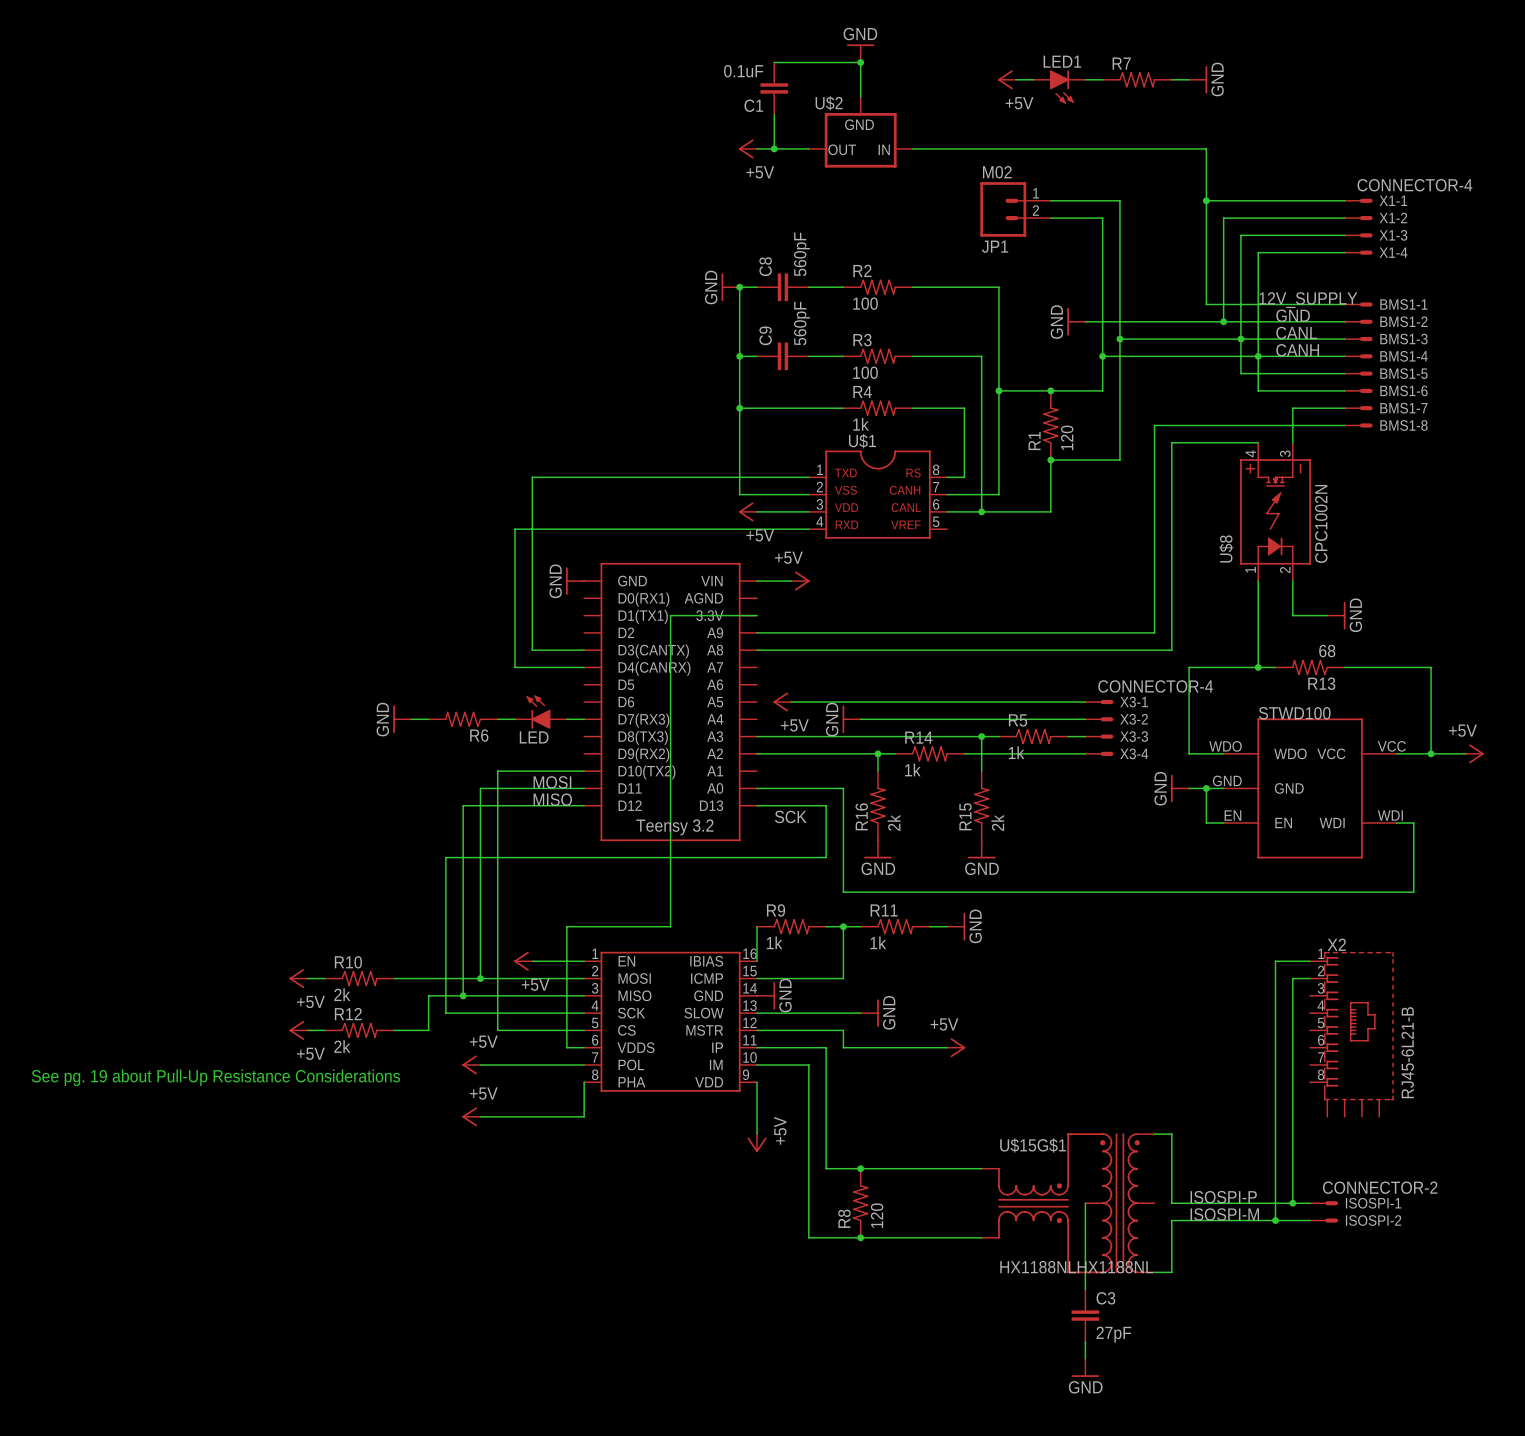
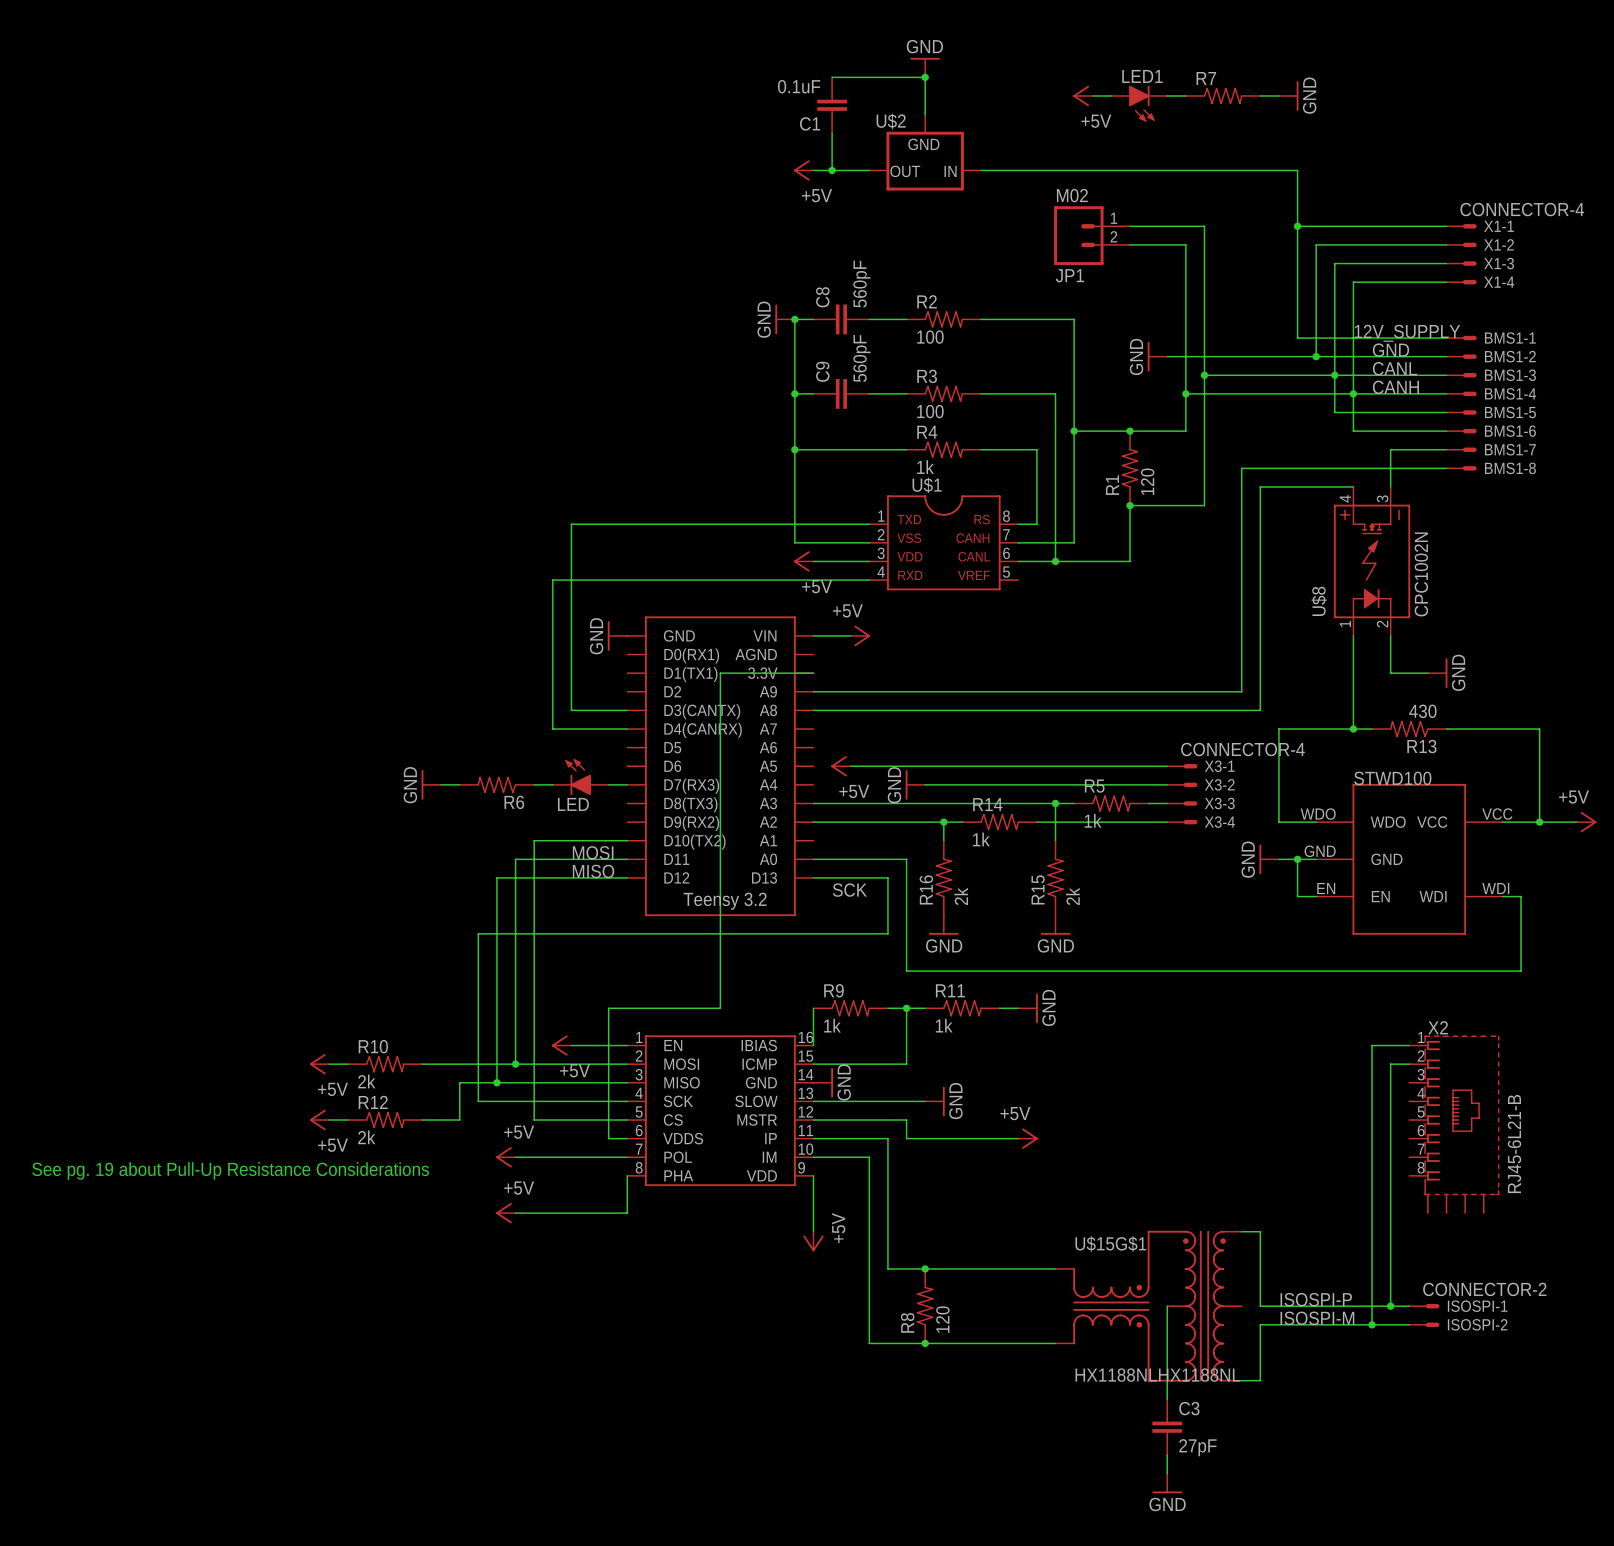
R13 value: 68 (1327, 651) -> 430 (1422, 711)

